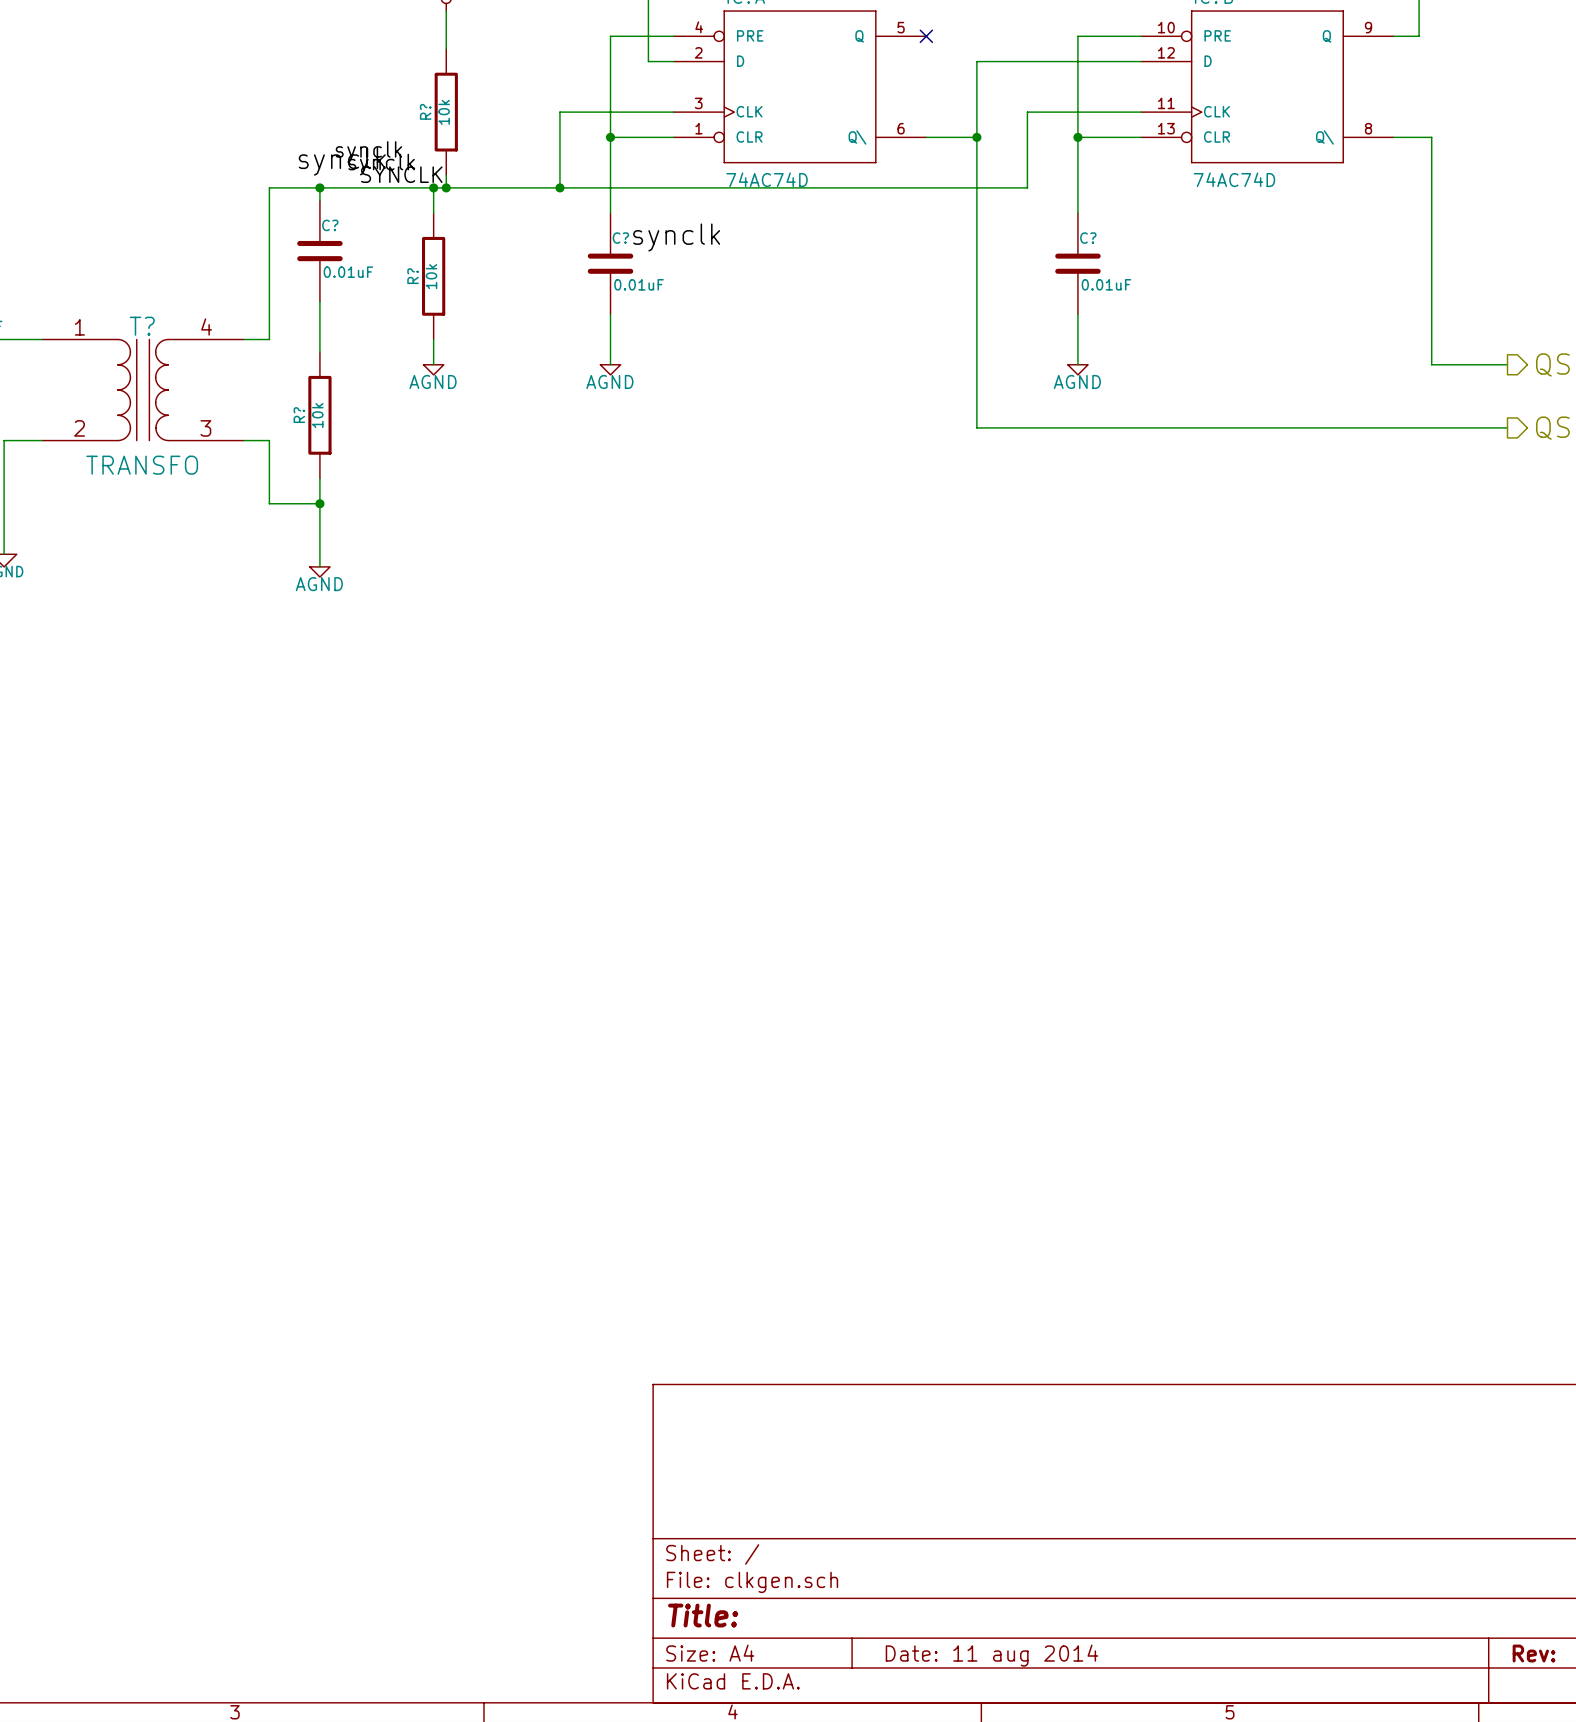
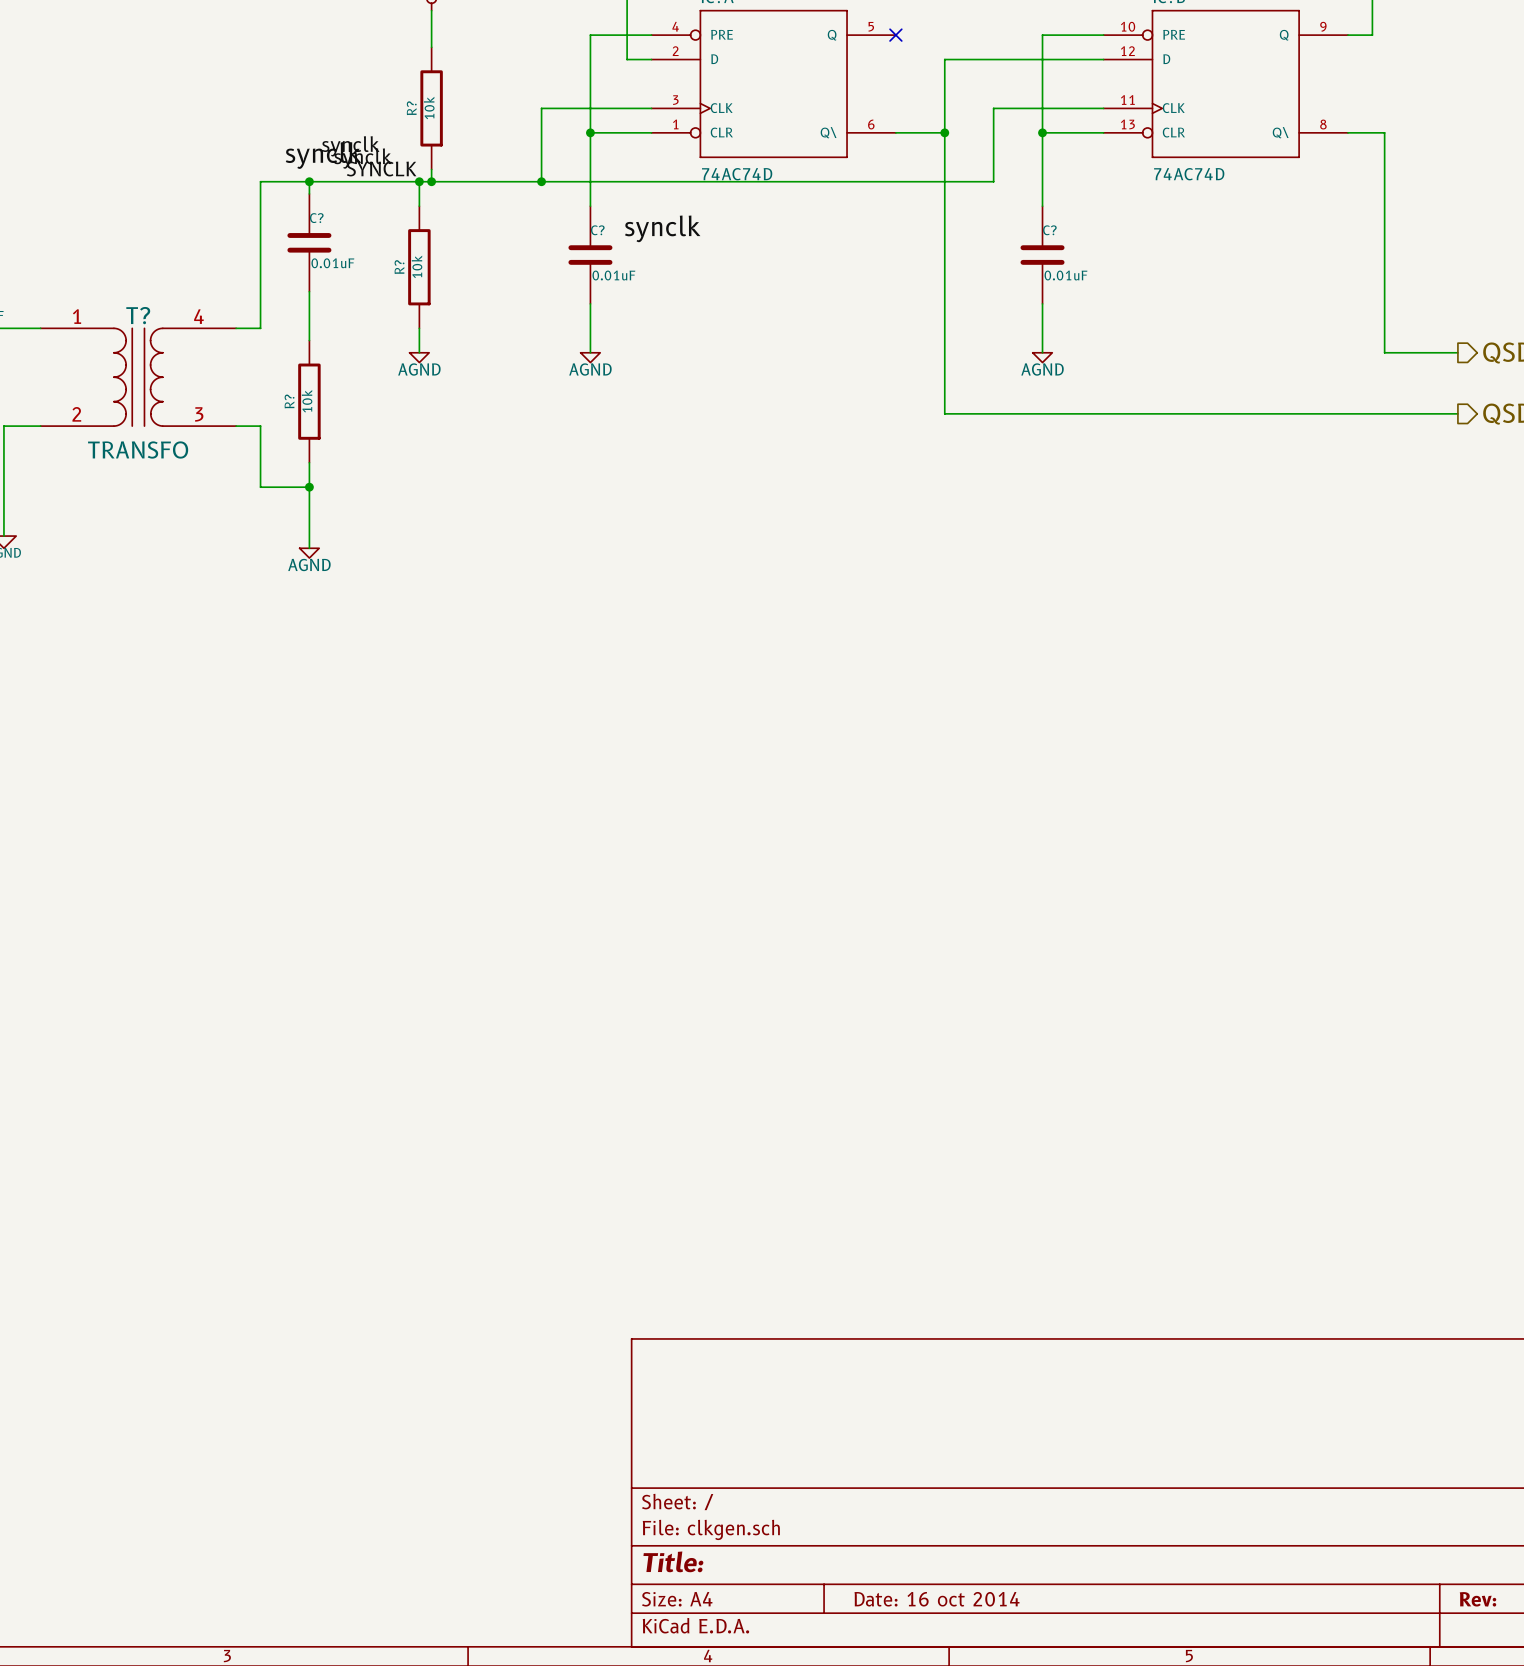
title block: Date: 11 aug 2014 (991, 1655) -> Date: 16 oct 2014 (937, 1599)

